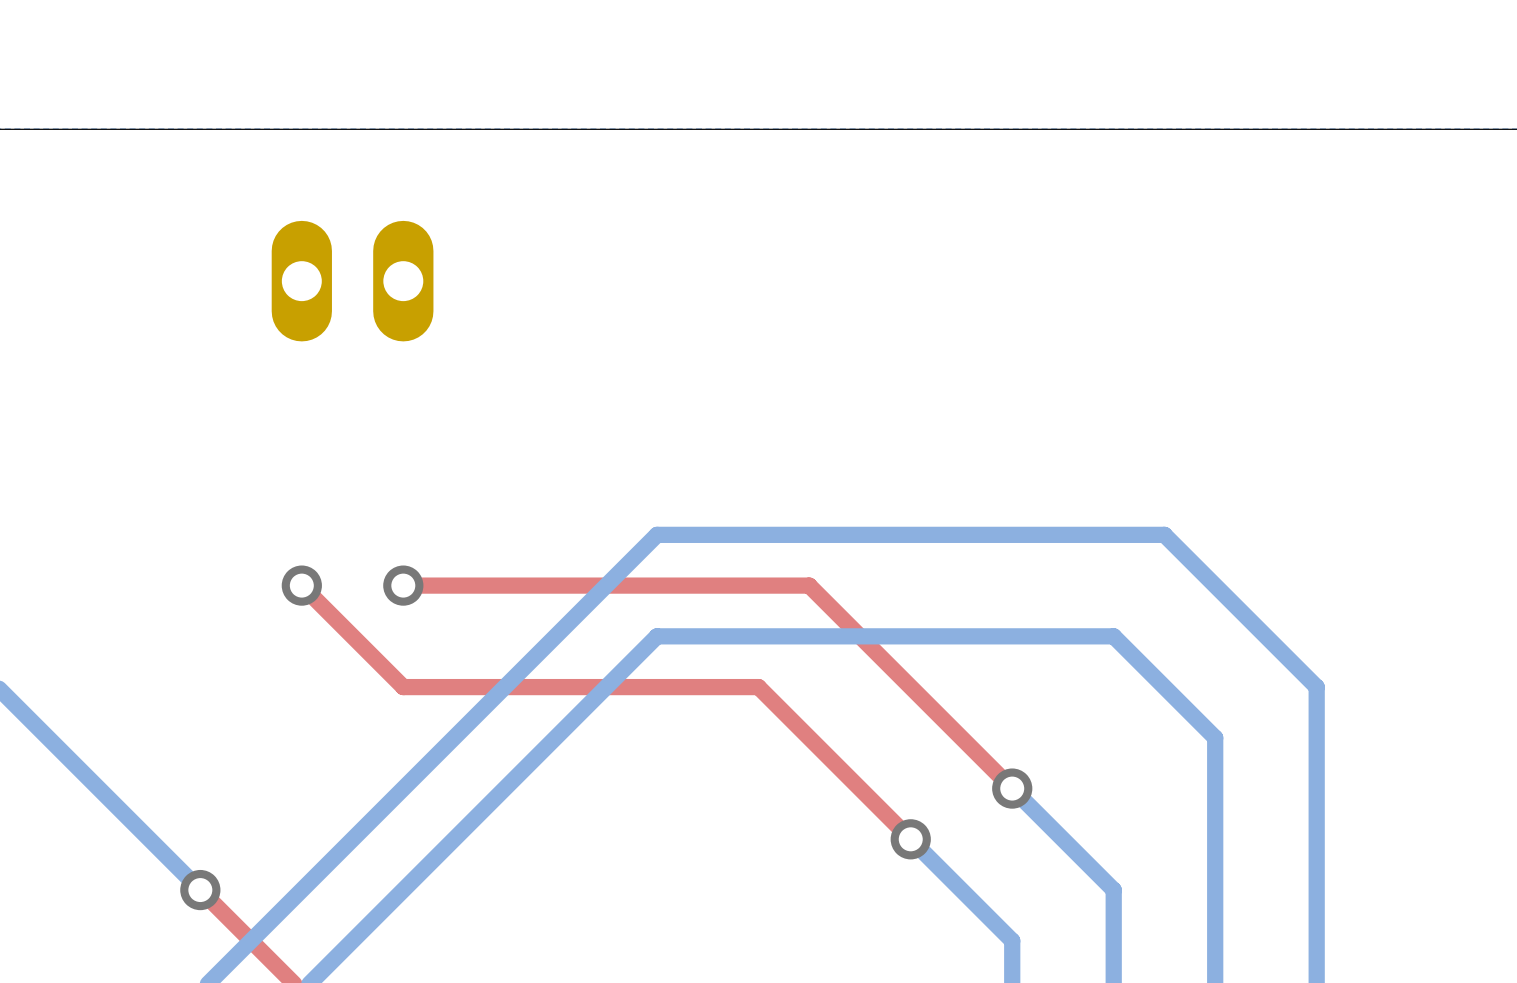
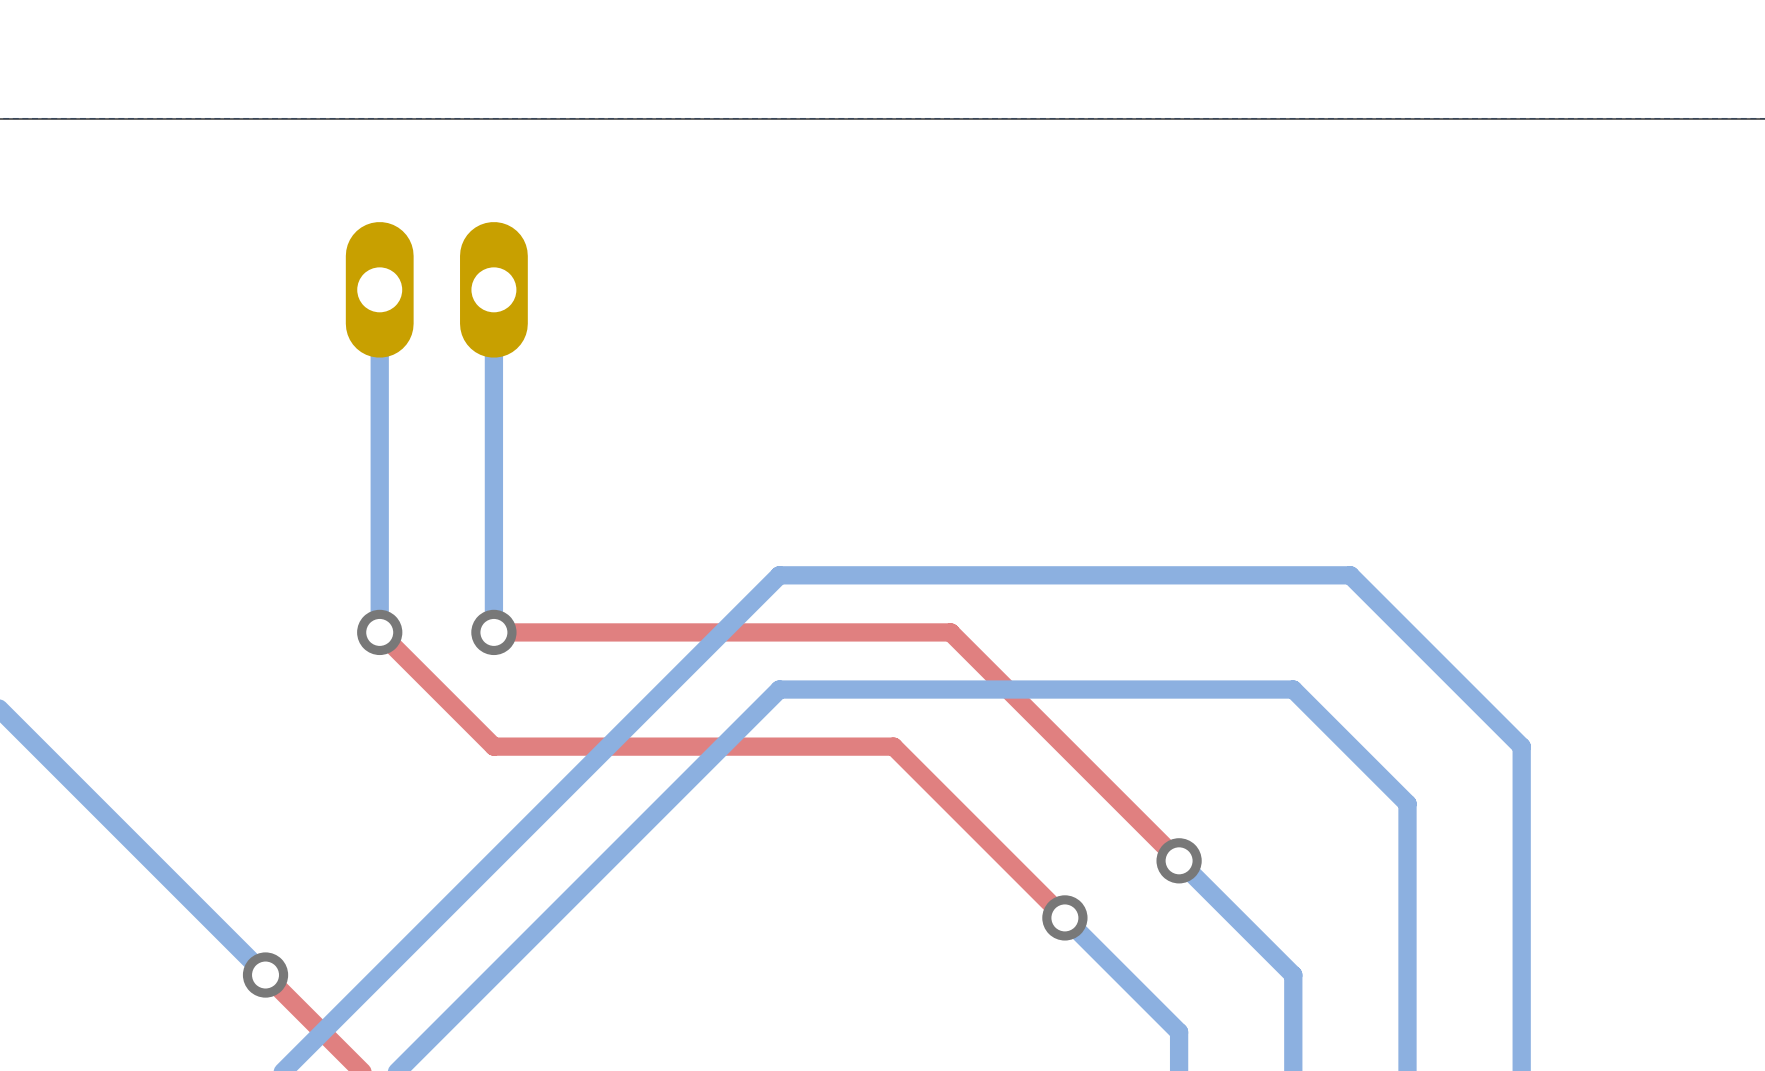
bottom track: none -> (379, 289) (379, 632)
bottom track: none -> (493, 289) (493, 632)

